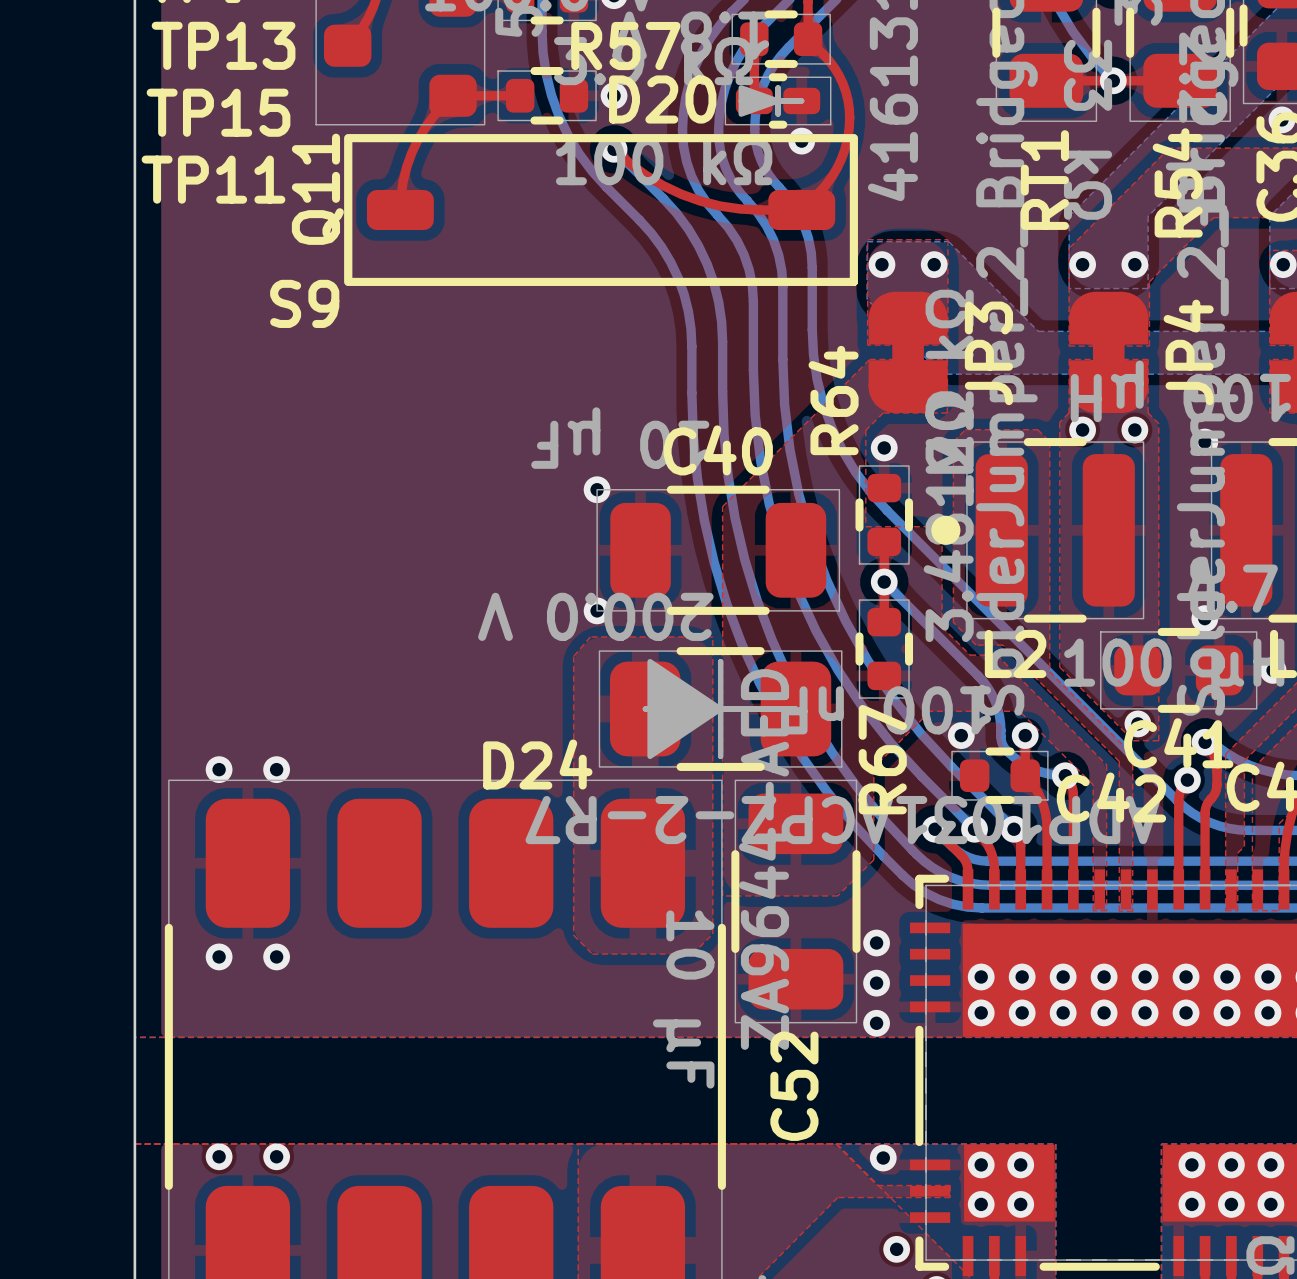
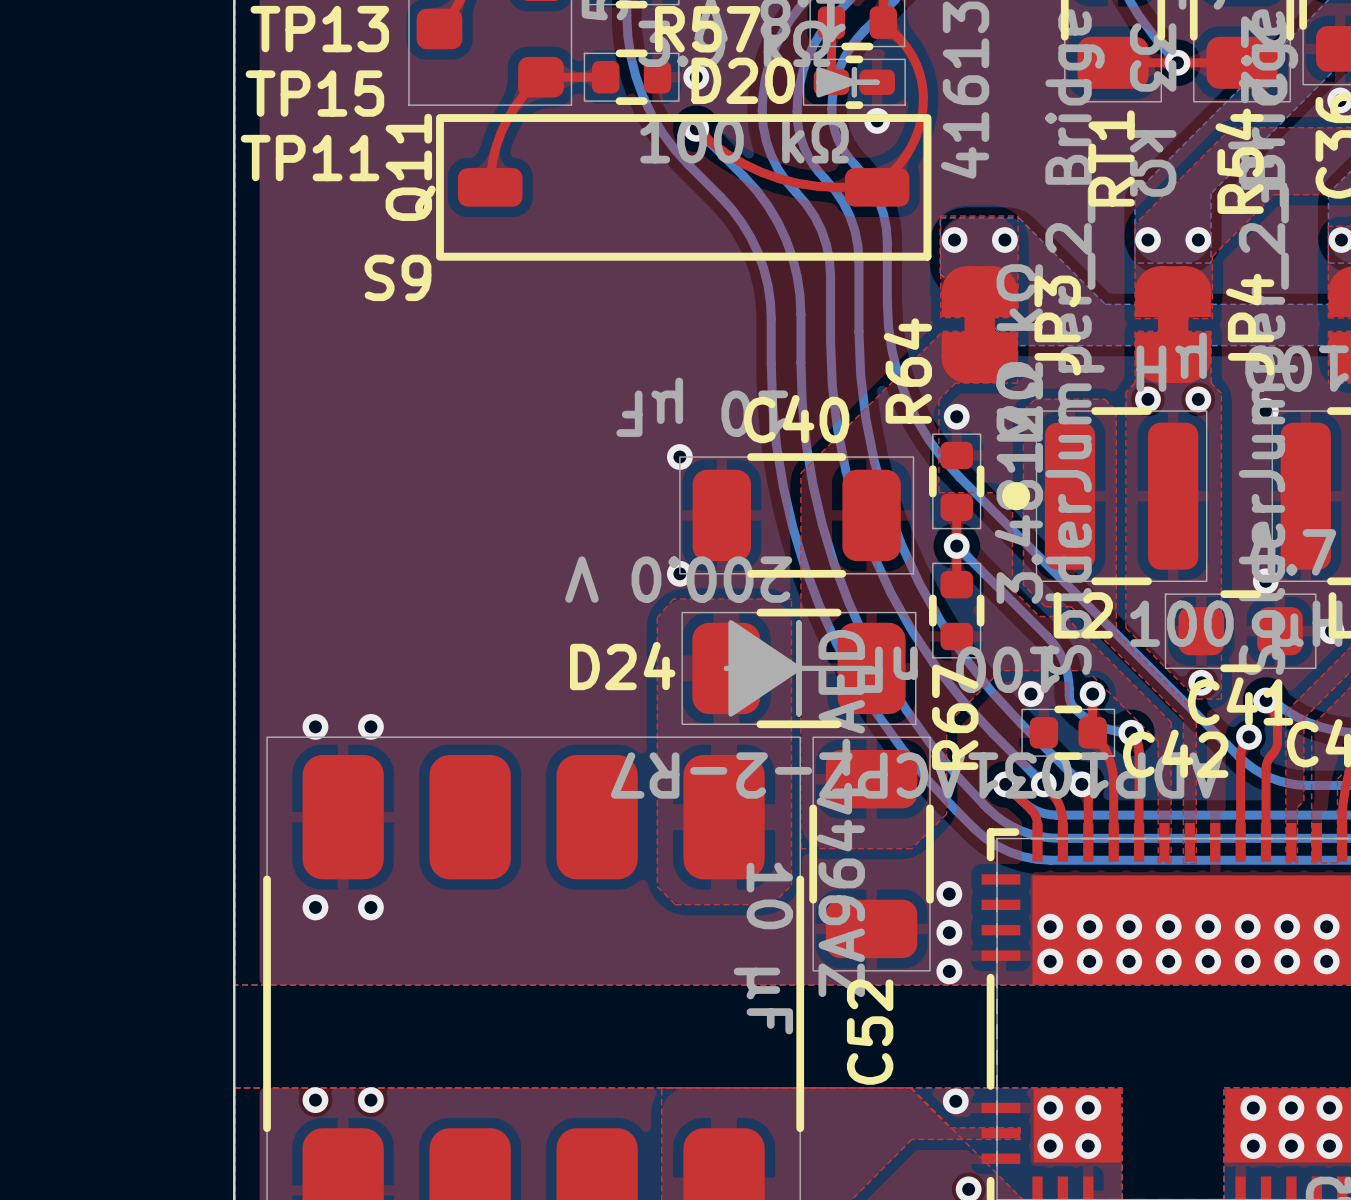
D24 name position: D24 (537, 764) -> D24 (622, 666)

